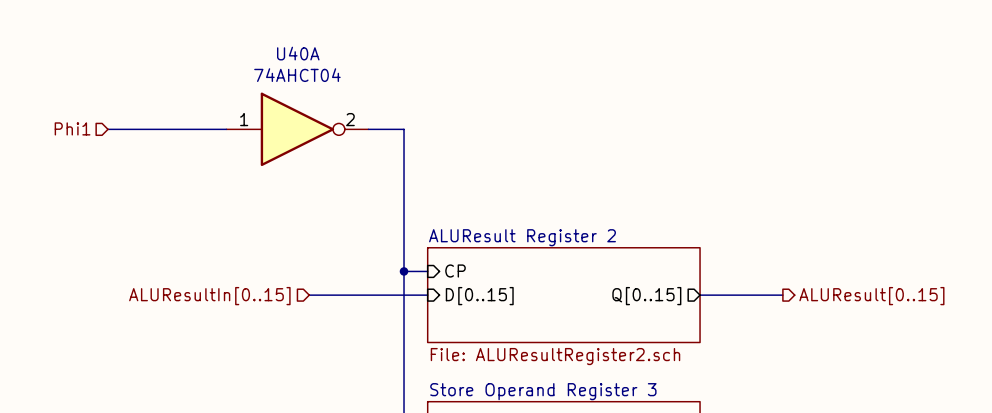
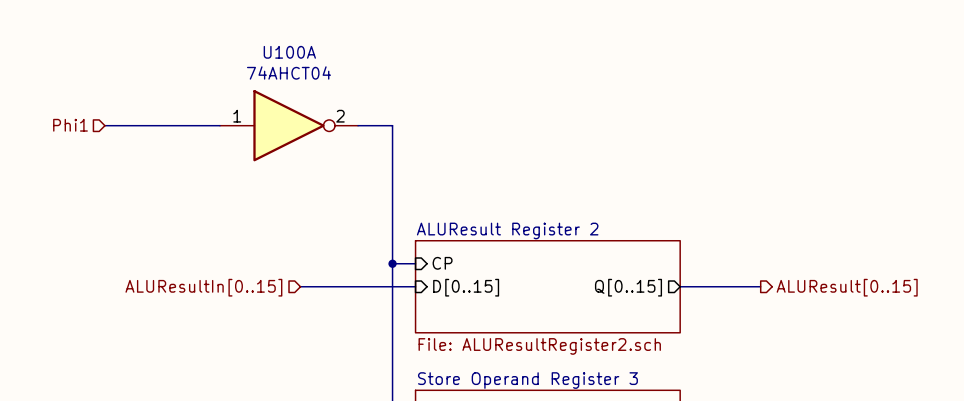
U40A name: U40A (298, 53) -> U100A (289, 52)

